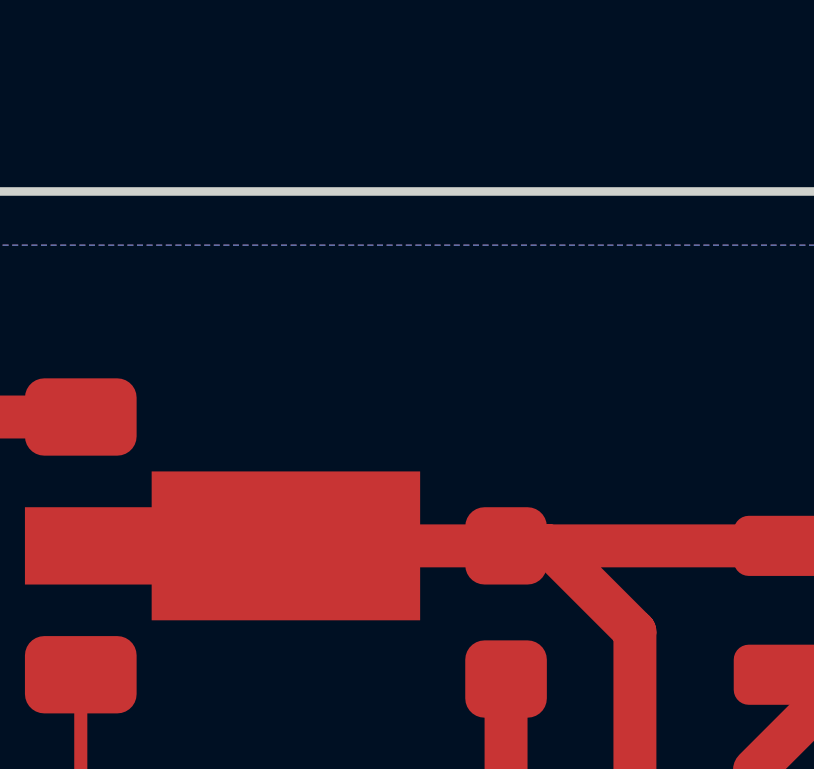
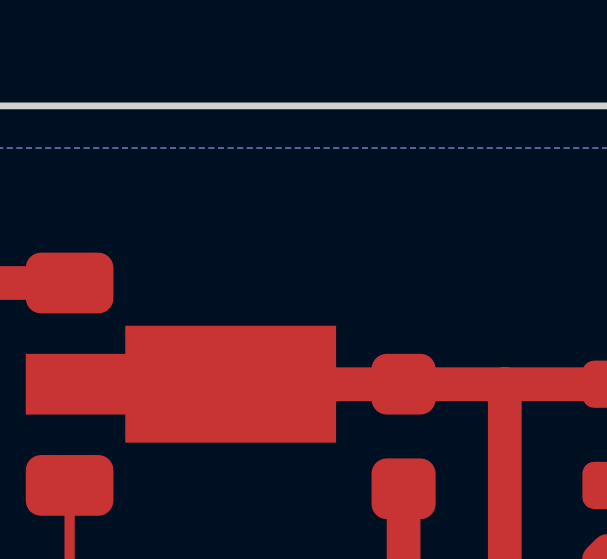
top track: (549, 545) (634, 631) -> (504, 384) (504, 451)

